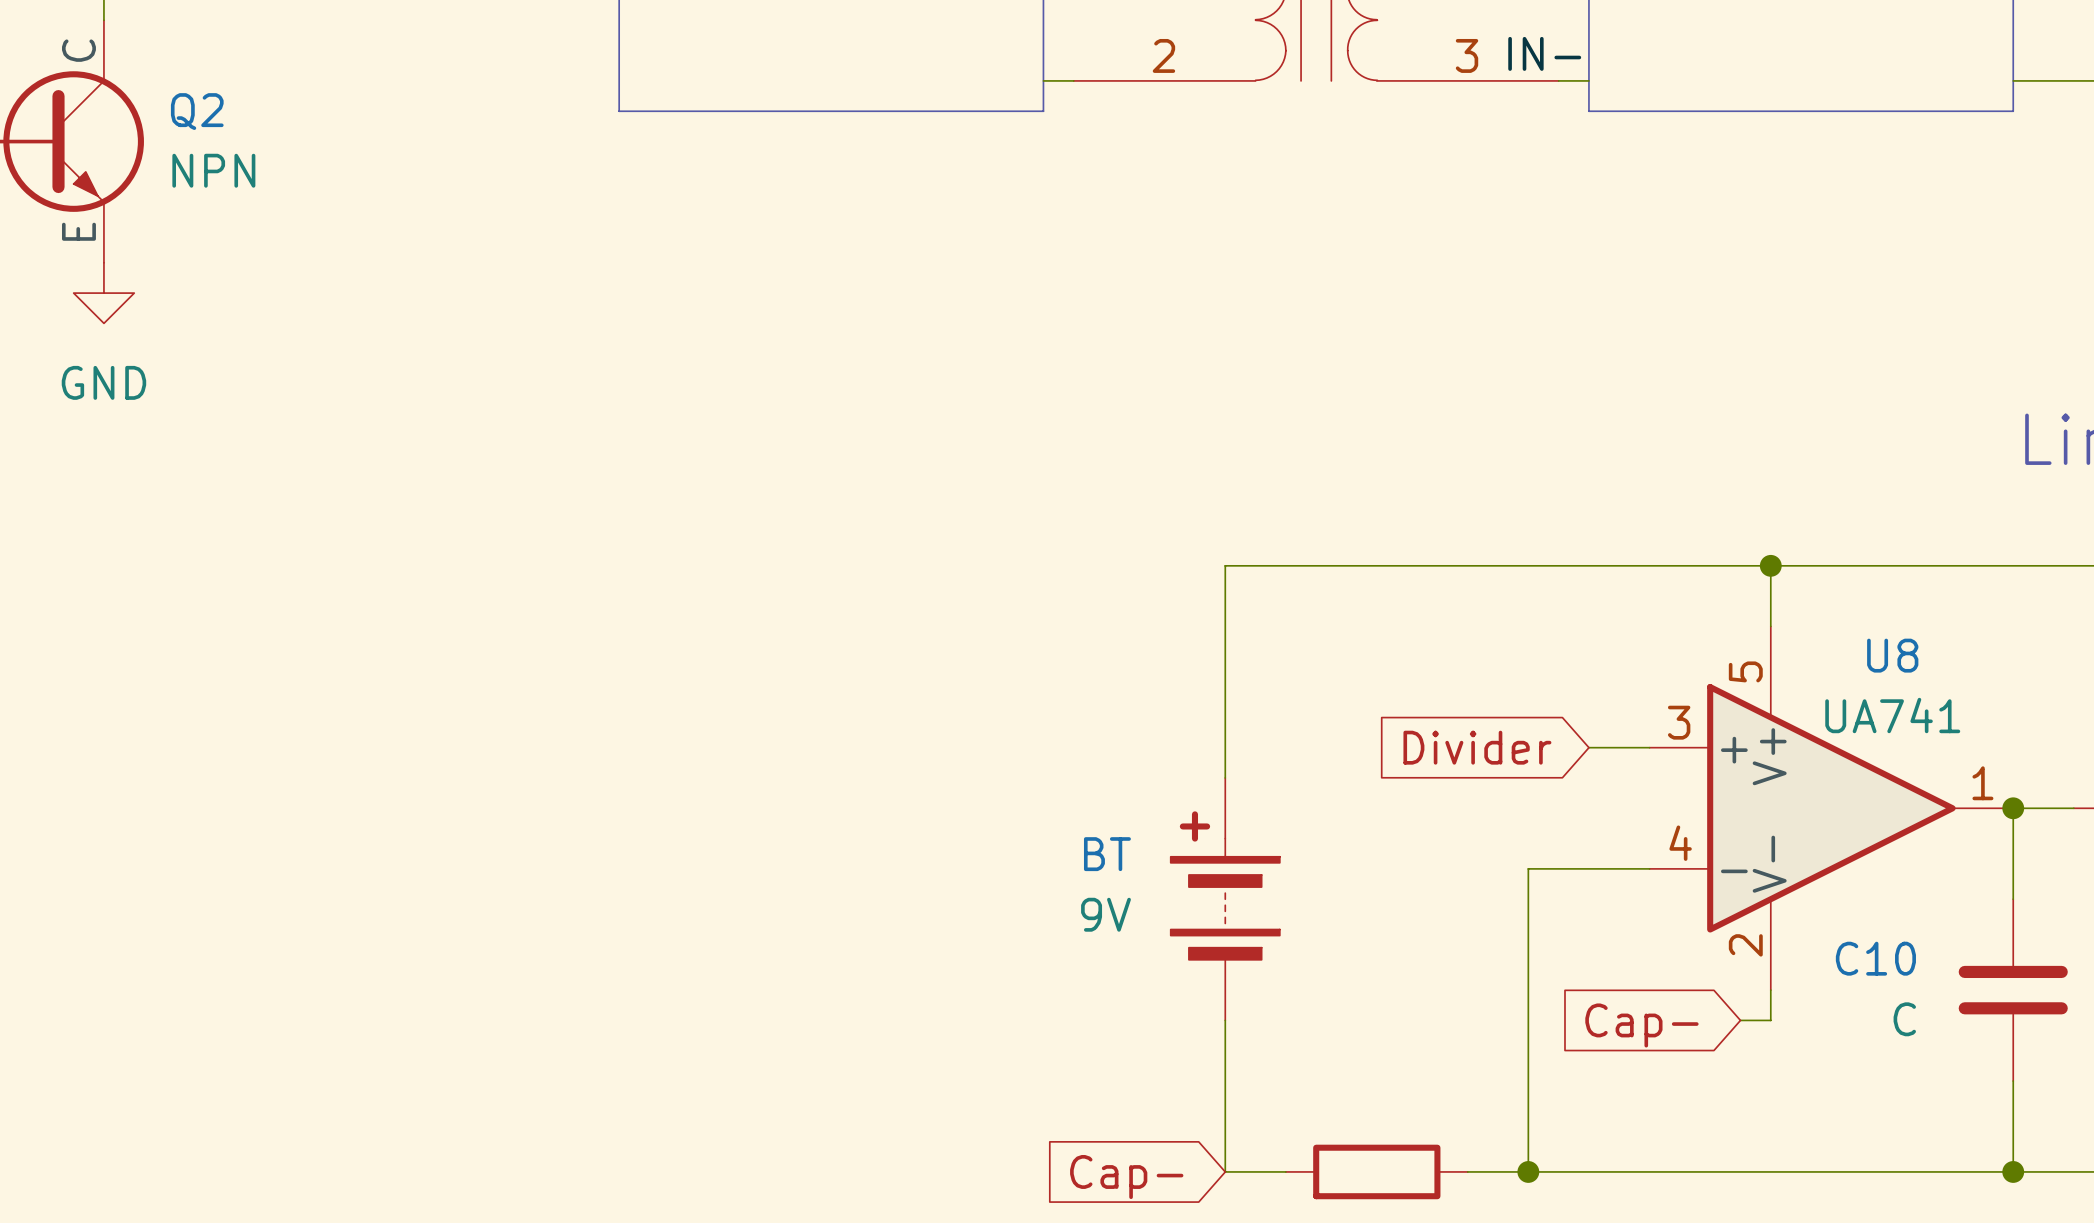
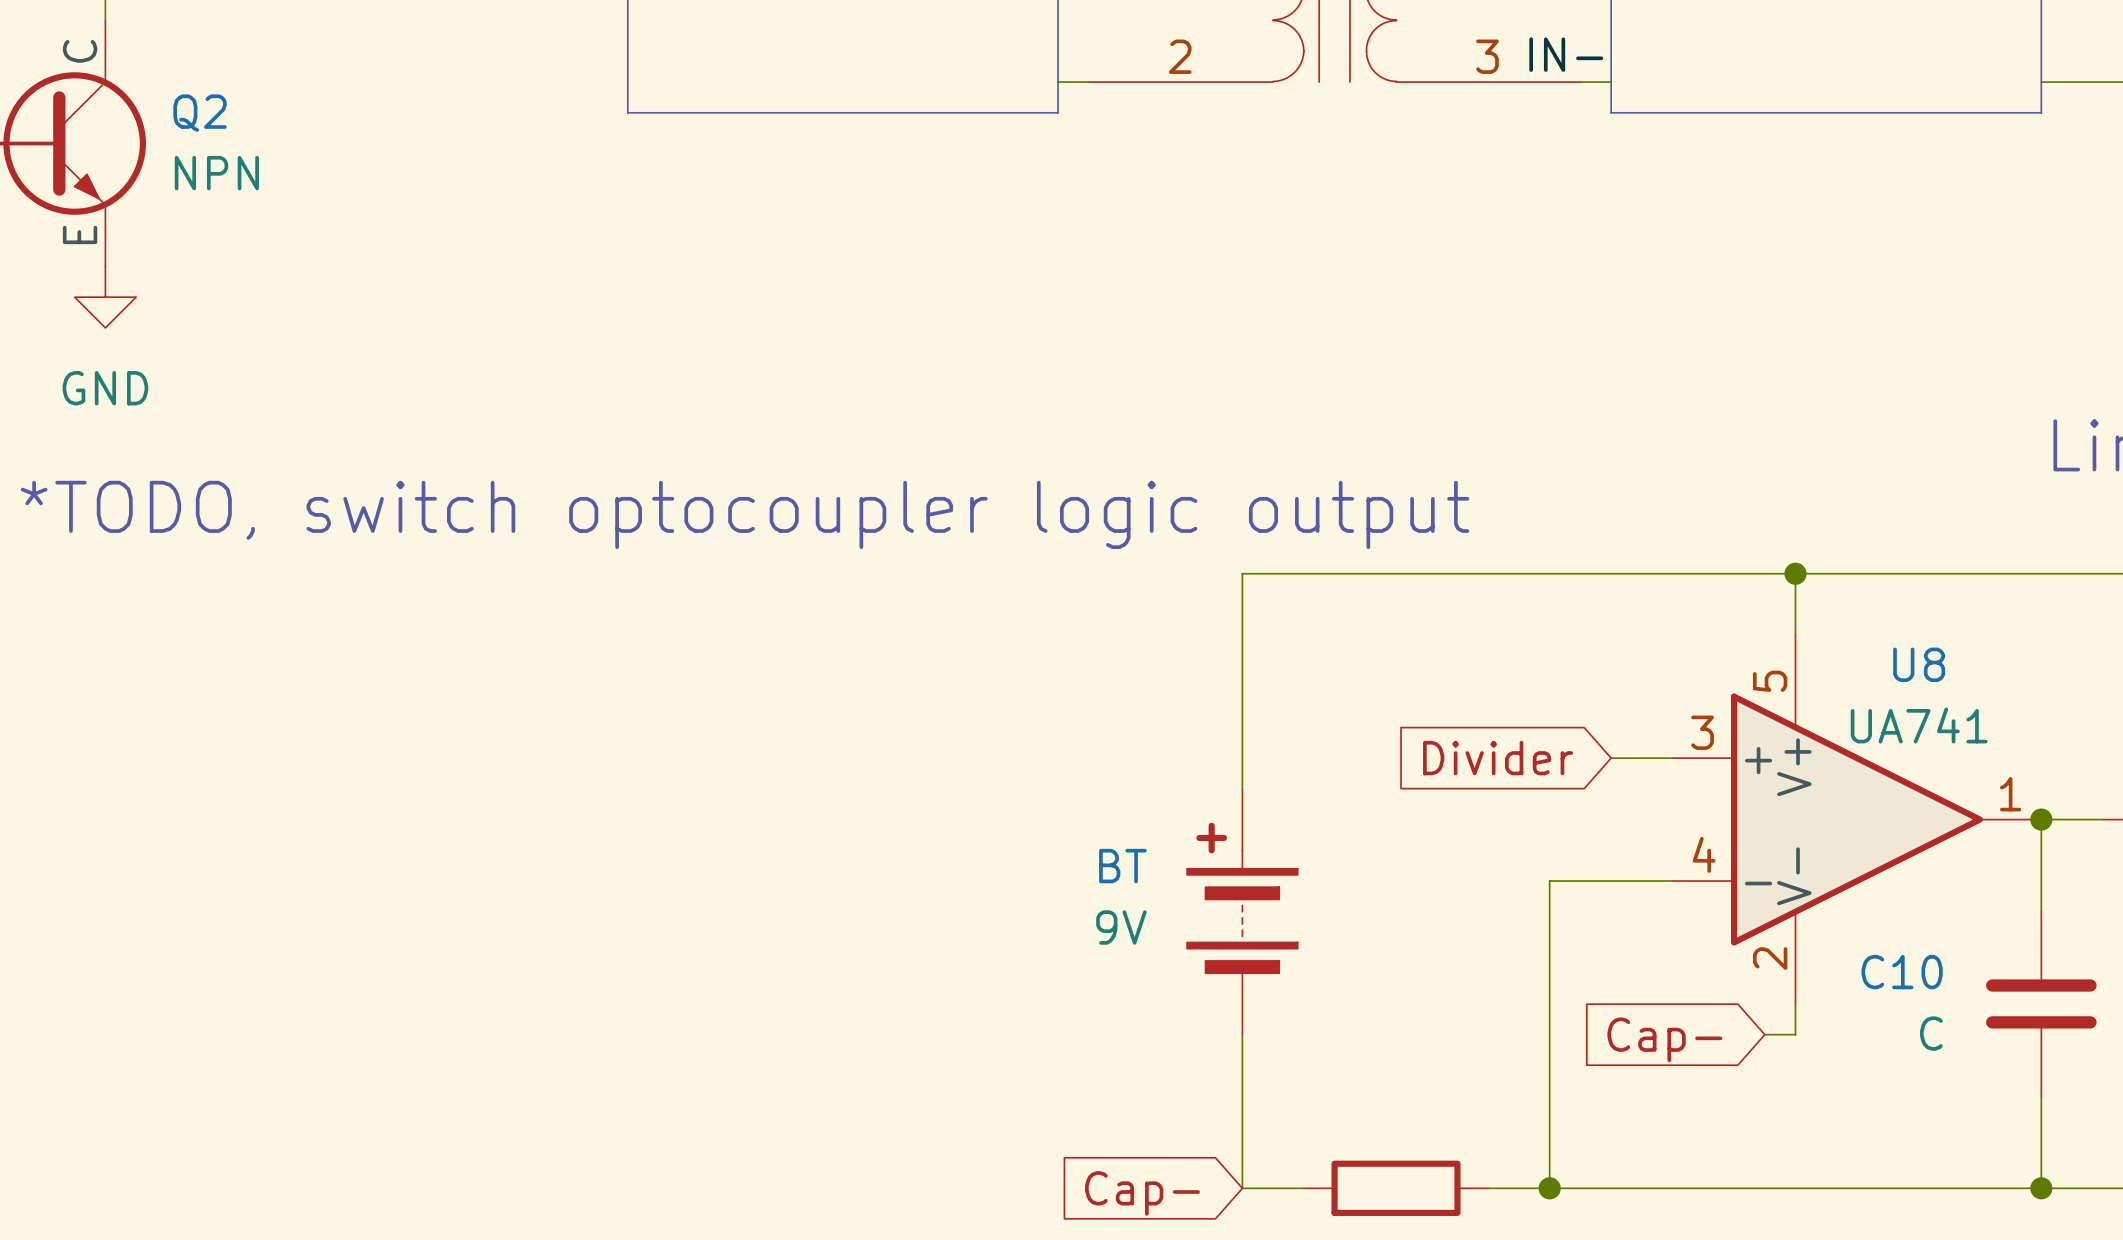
text: none -> *TODO, switch optocoupler logic output (744, 514)

